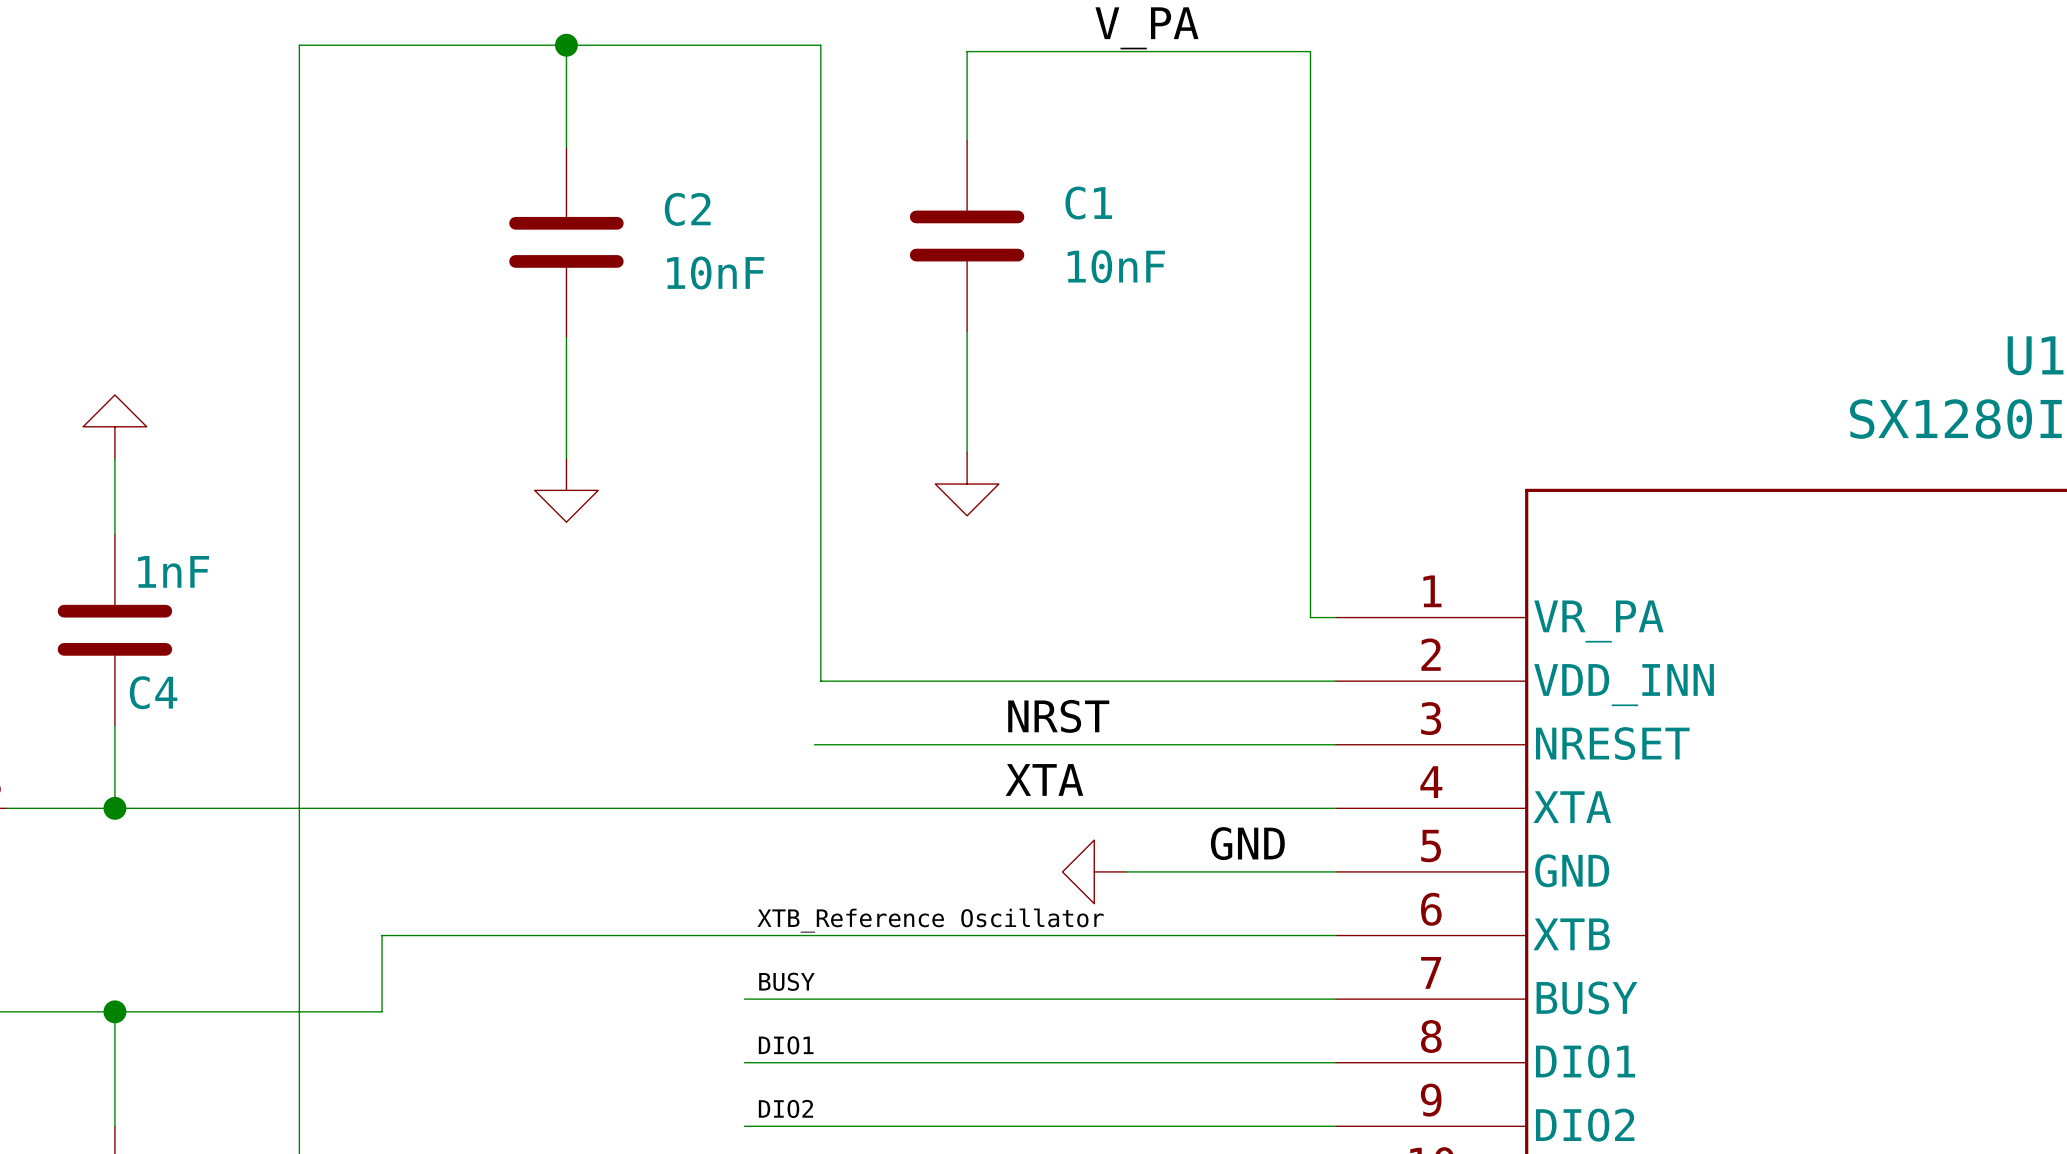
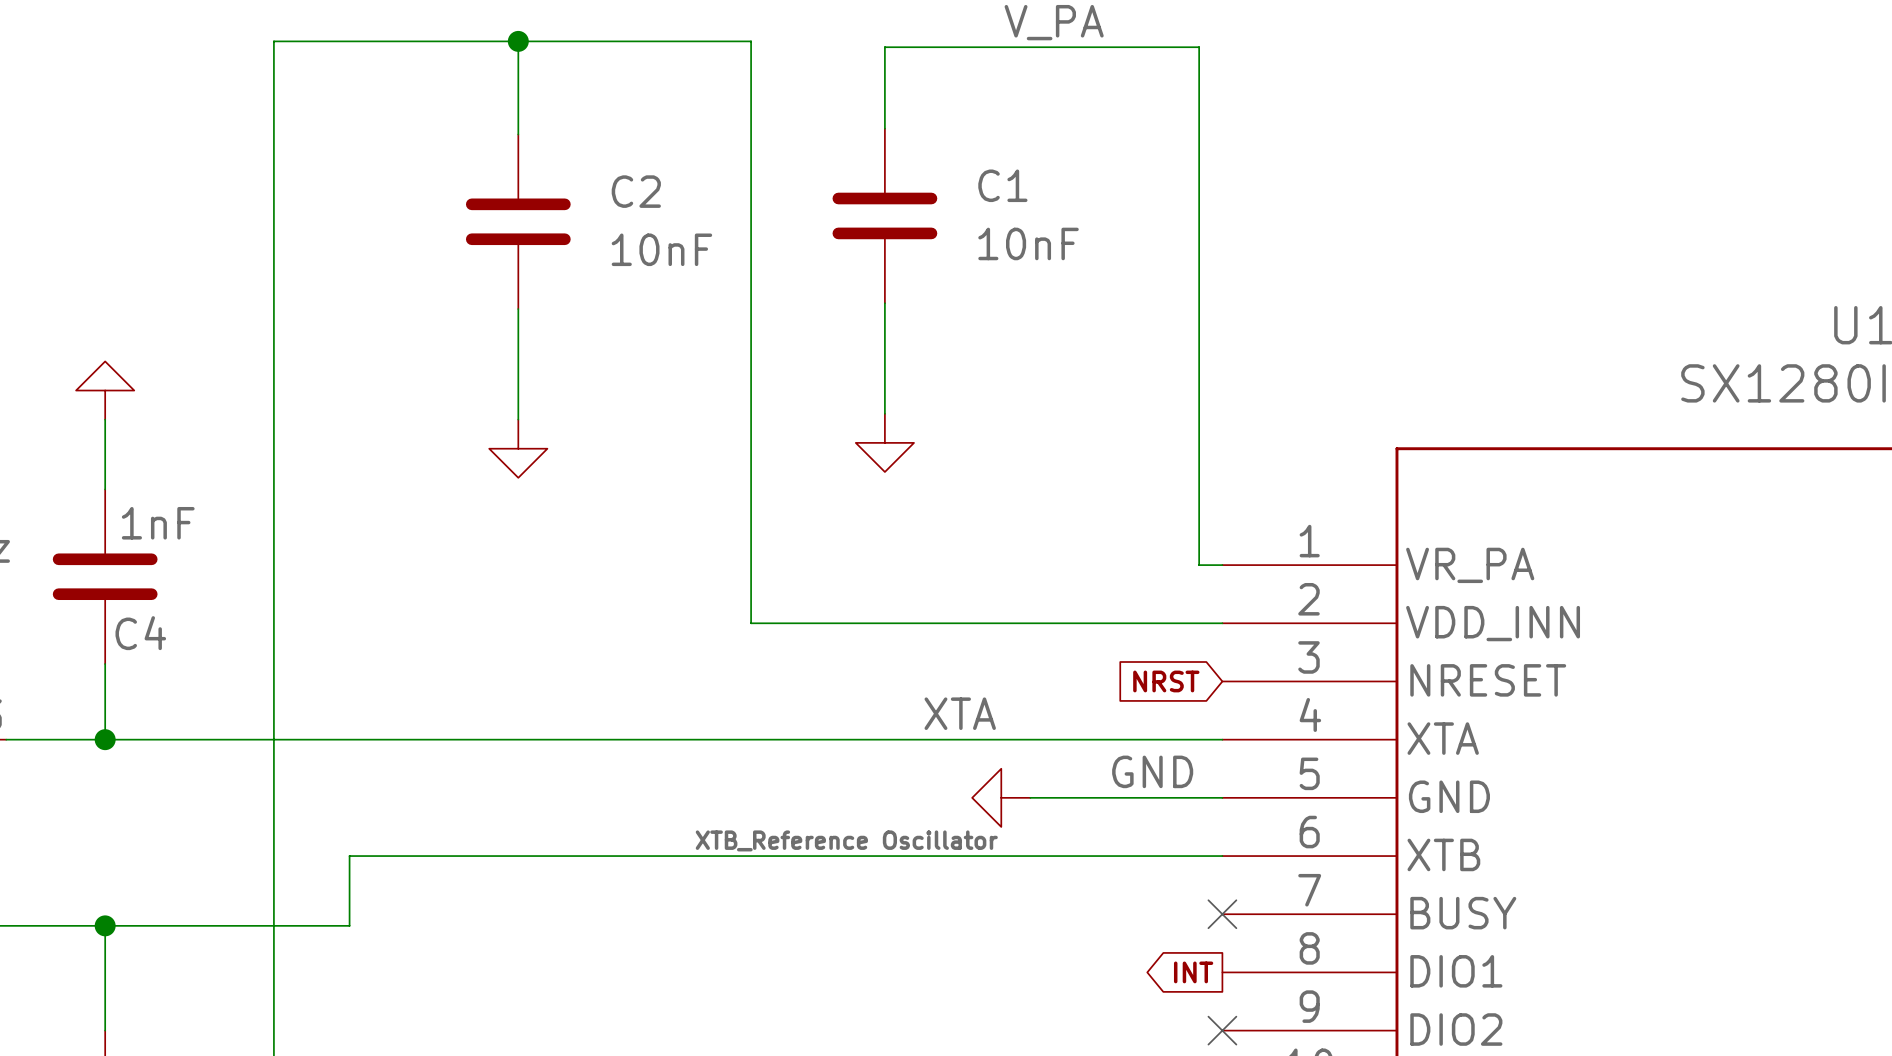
label: NRST (1058, 716) -> none
wire: (814, 744) (1335, 744) -> none
global label: none -> NRST (1166, 681)
label: BUSY (786, 981) -> none
wire: (744, 999) (1335, 999) -> none
no-connect mark: none -> (1222, 914)
label: DIO1 (786, 1045) -> none
wire: (744, 1062) (1335, 1062) -> none
global label: none -> INT (1193, 972)
label: DIO2 (785, 1108) -> none
wire: (744, 1126) (1335, 1126) -> none
no-connect mark: none -> (1222, 1030)

